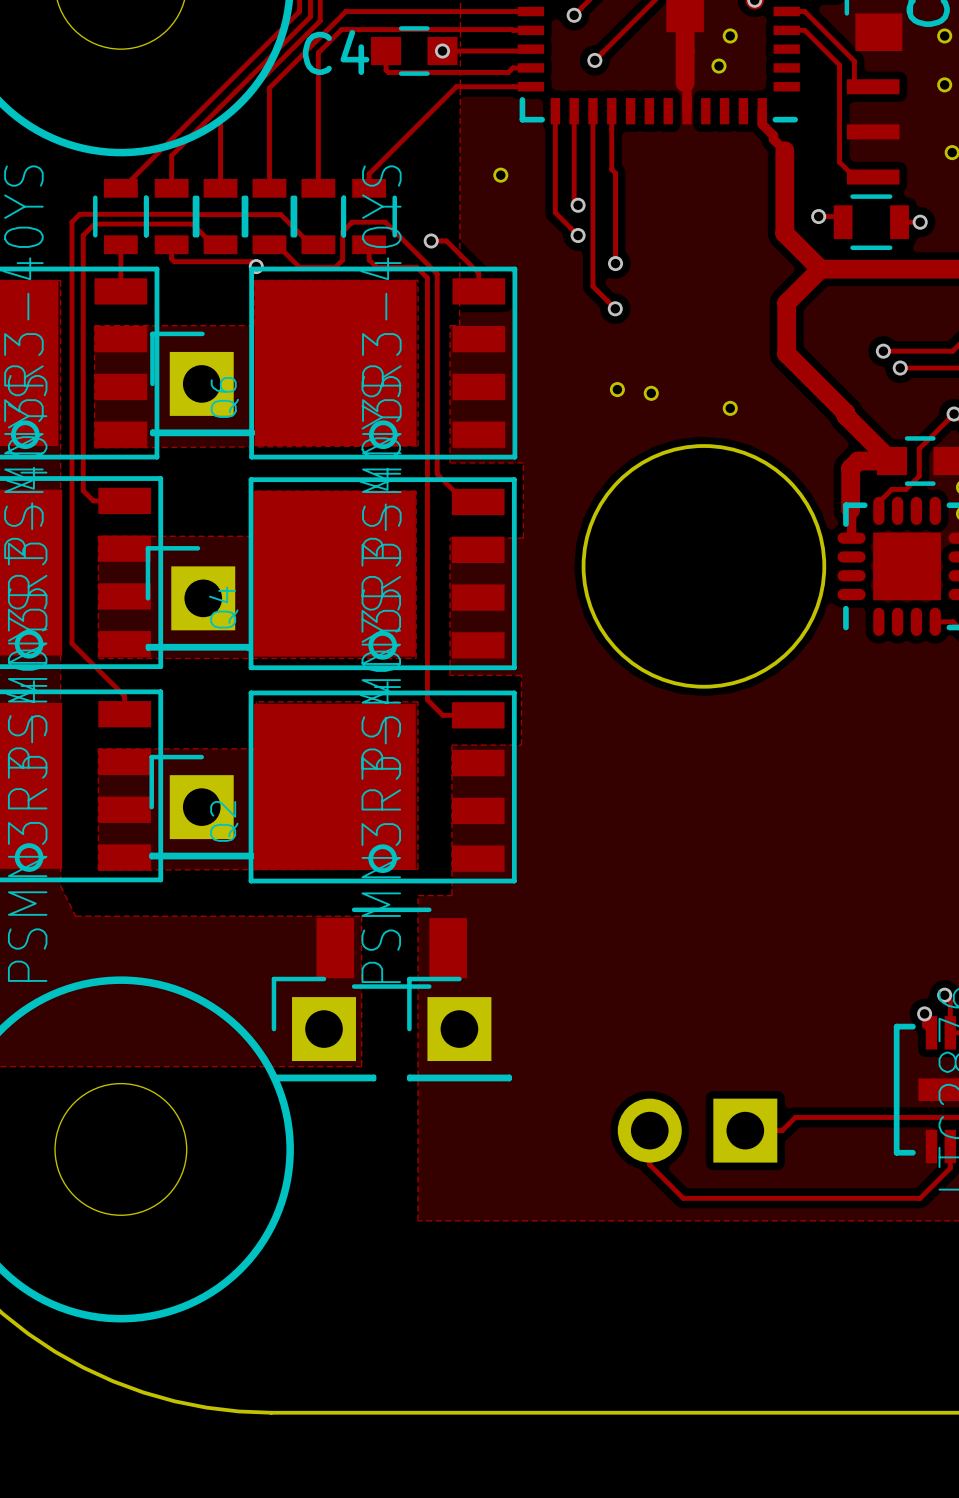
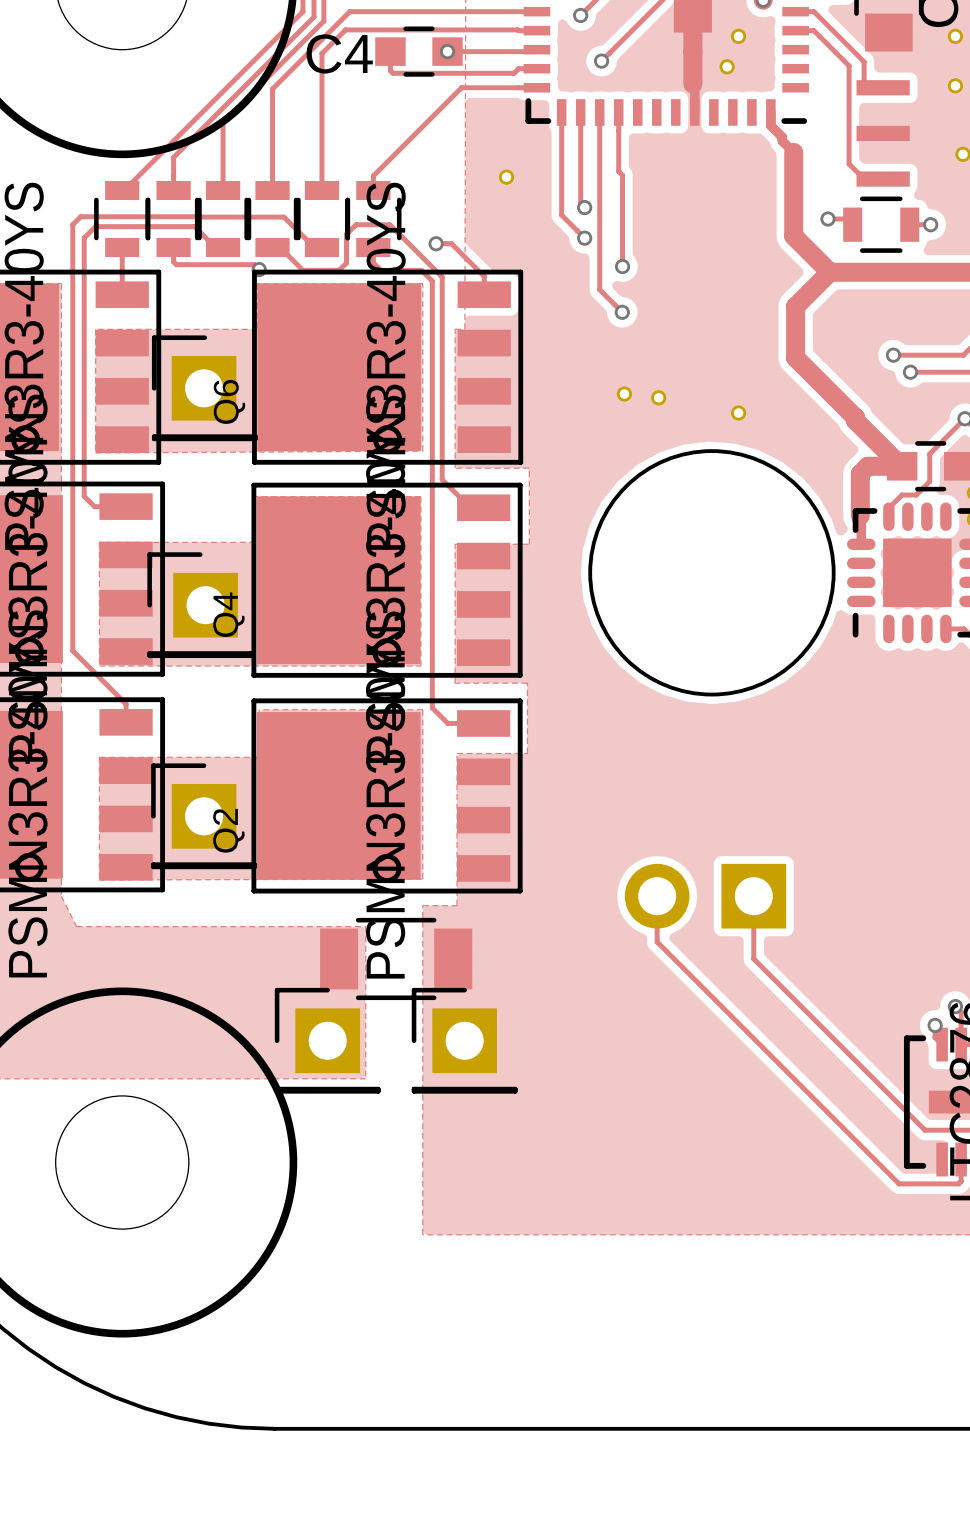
track: (914, 1117) (795, 1117) (782, 1130) (745, 1130) -> (924, 1130) (753, 958) (753, 896)
track: (649, 1130) (649, 1164) (683, 1198) (920, 1198) (947, 1170) -> (657, 896) (657, 941) (899, 1183) (958, 1183)
part position: (697, 1130) -> (705, 896)

